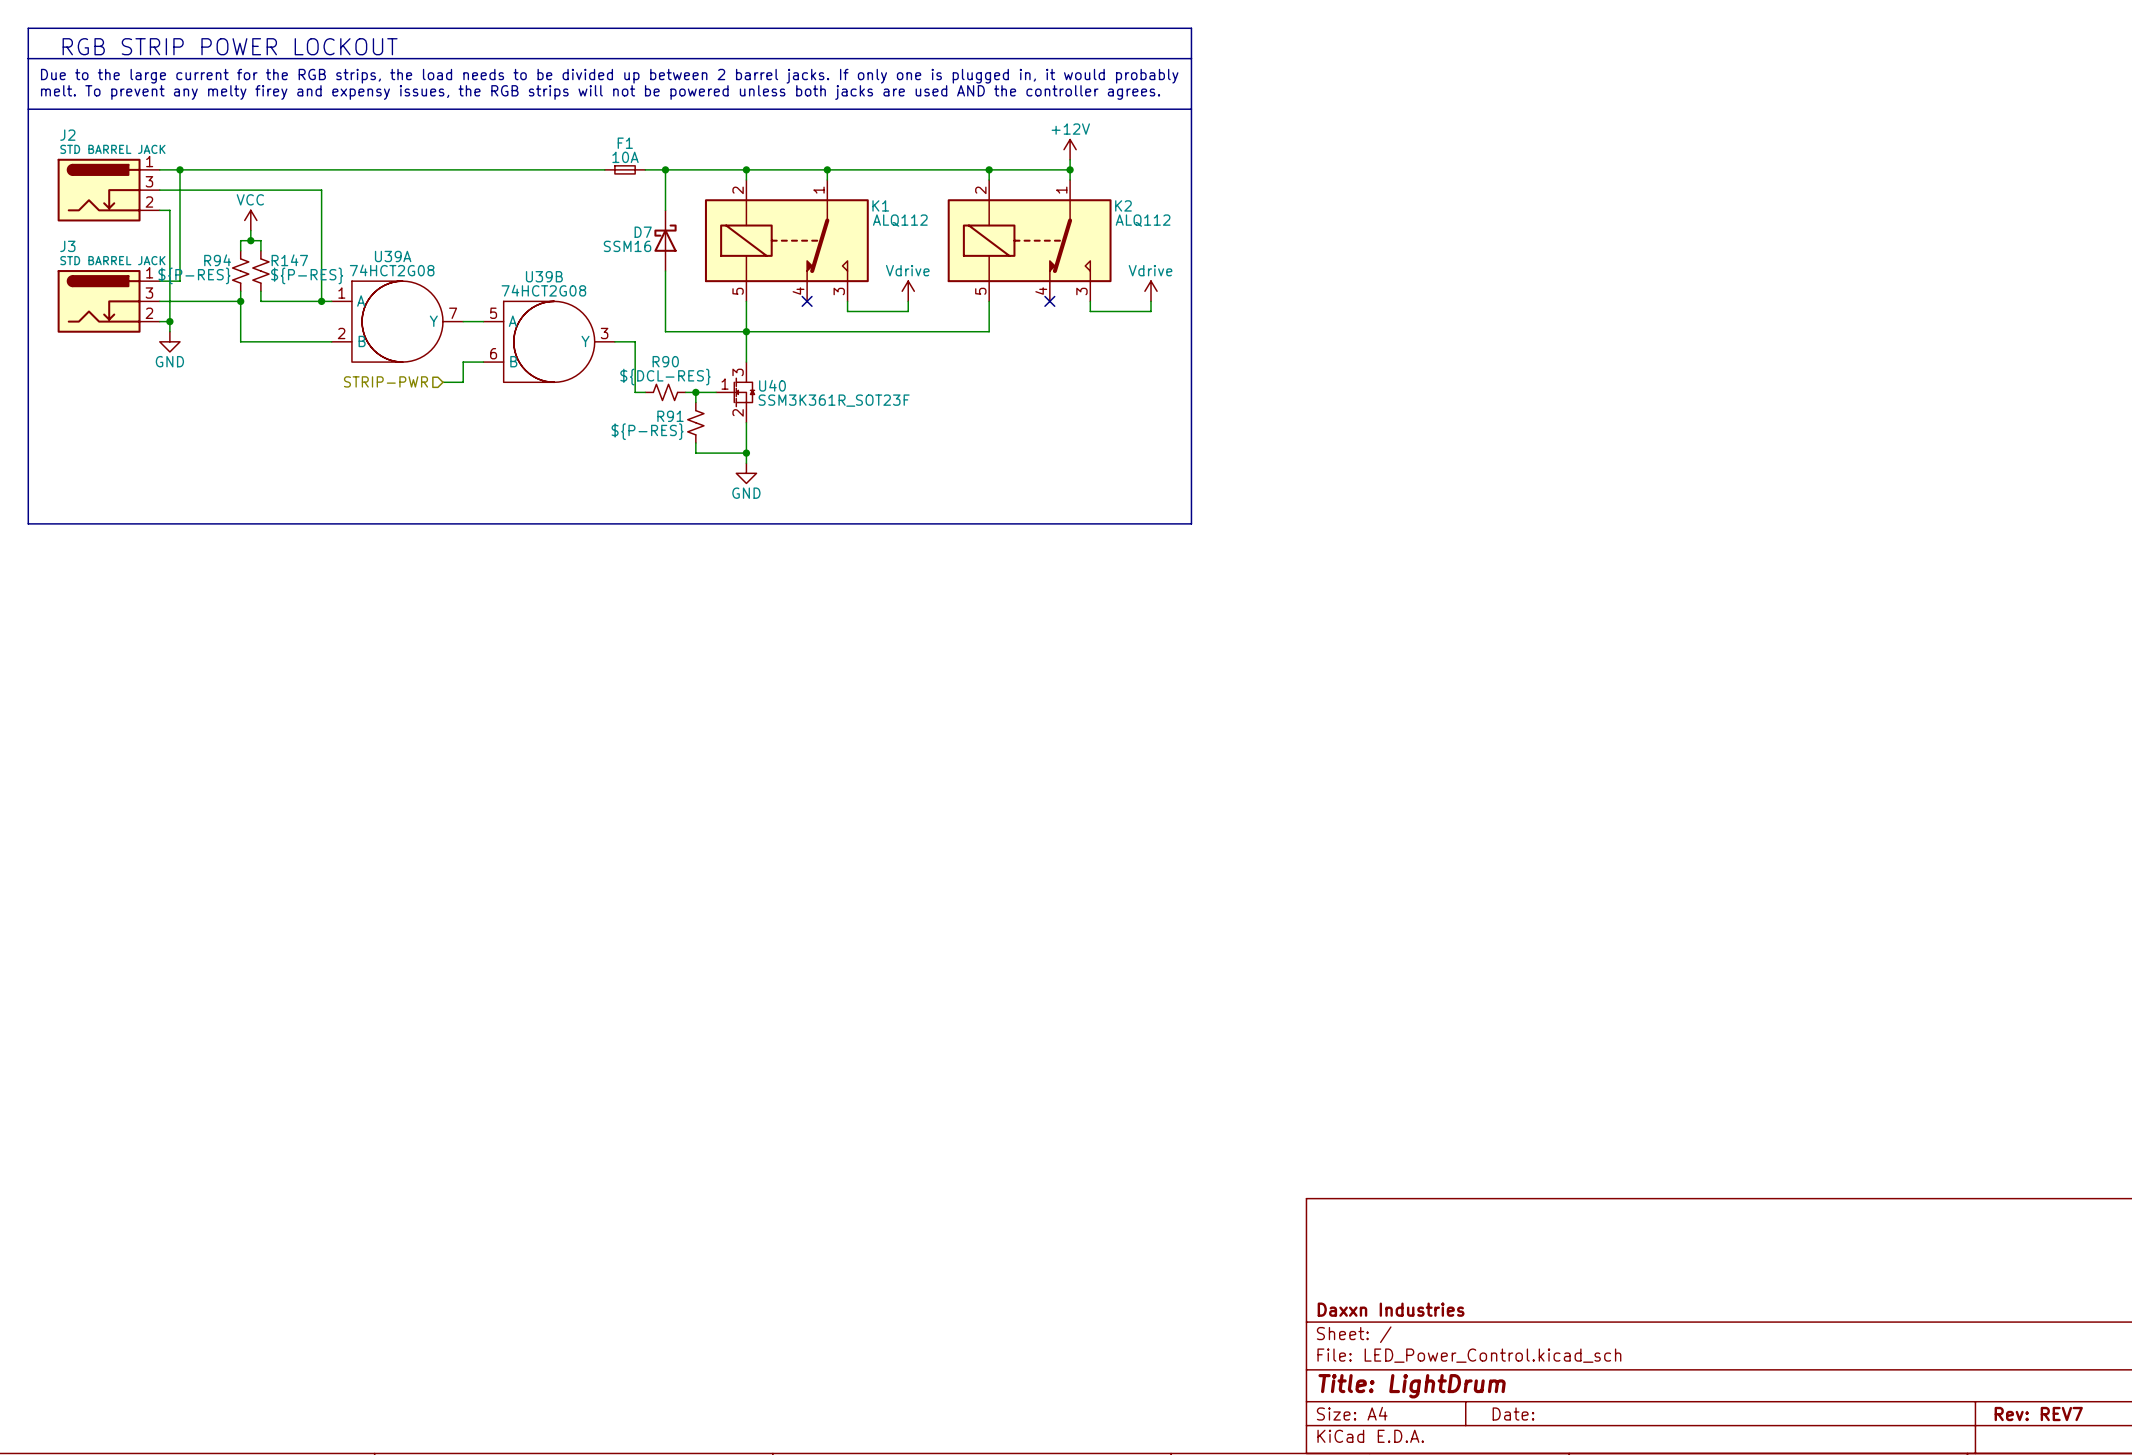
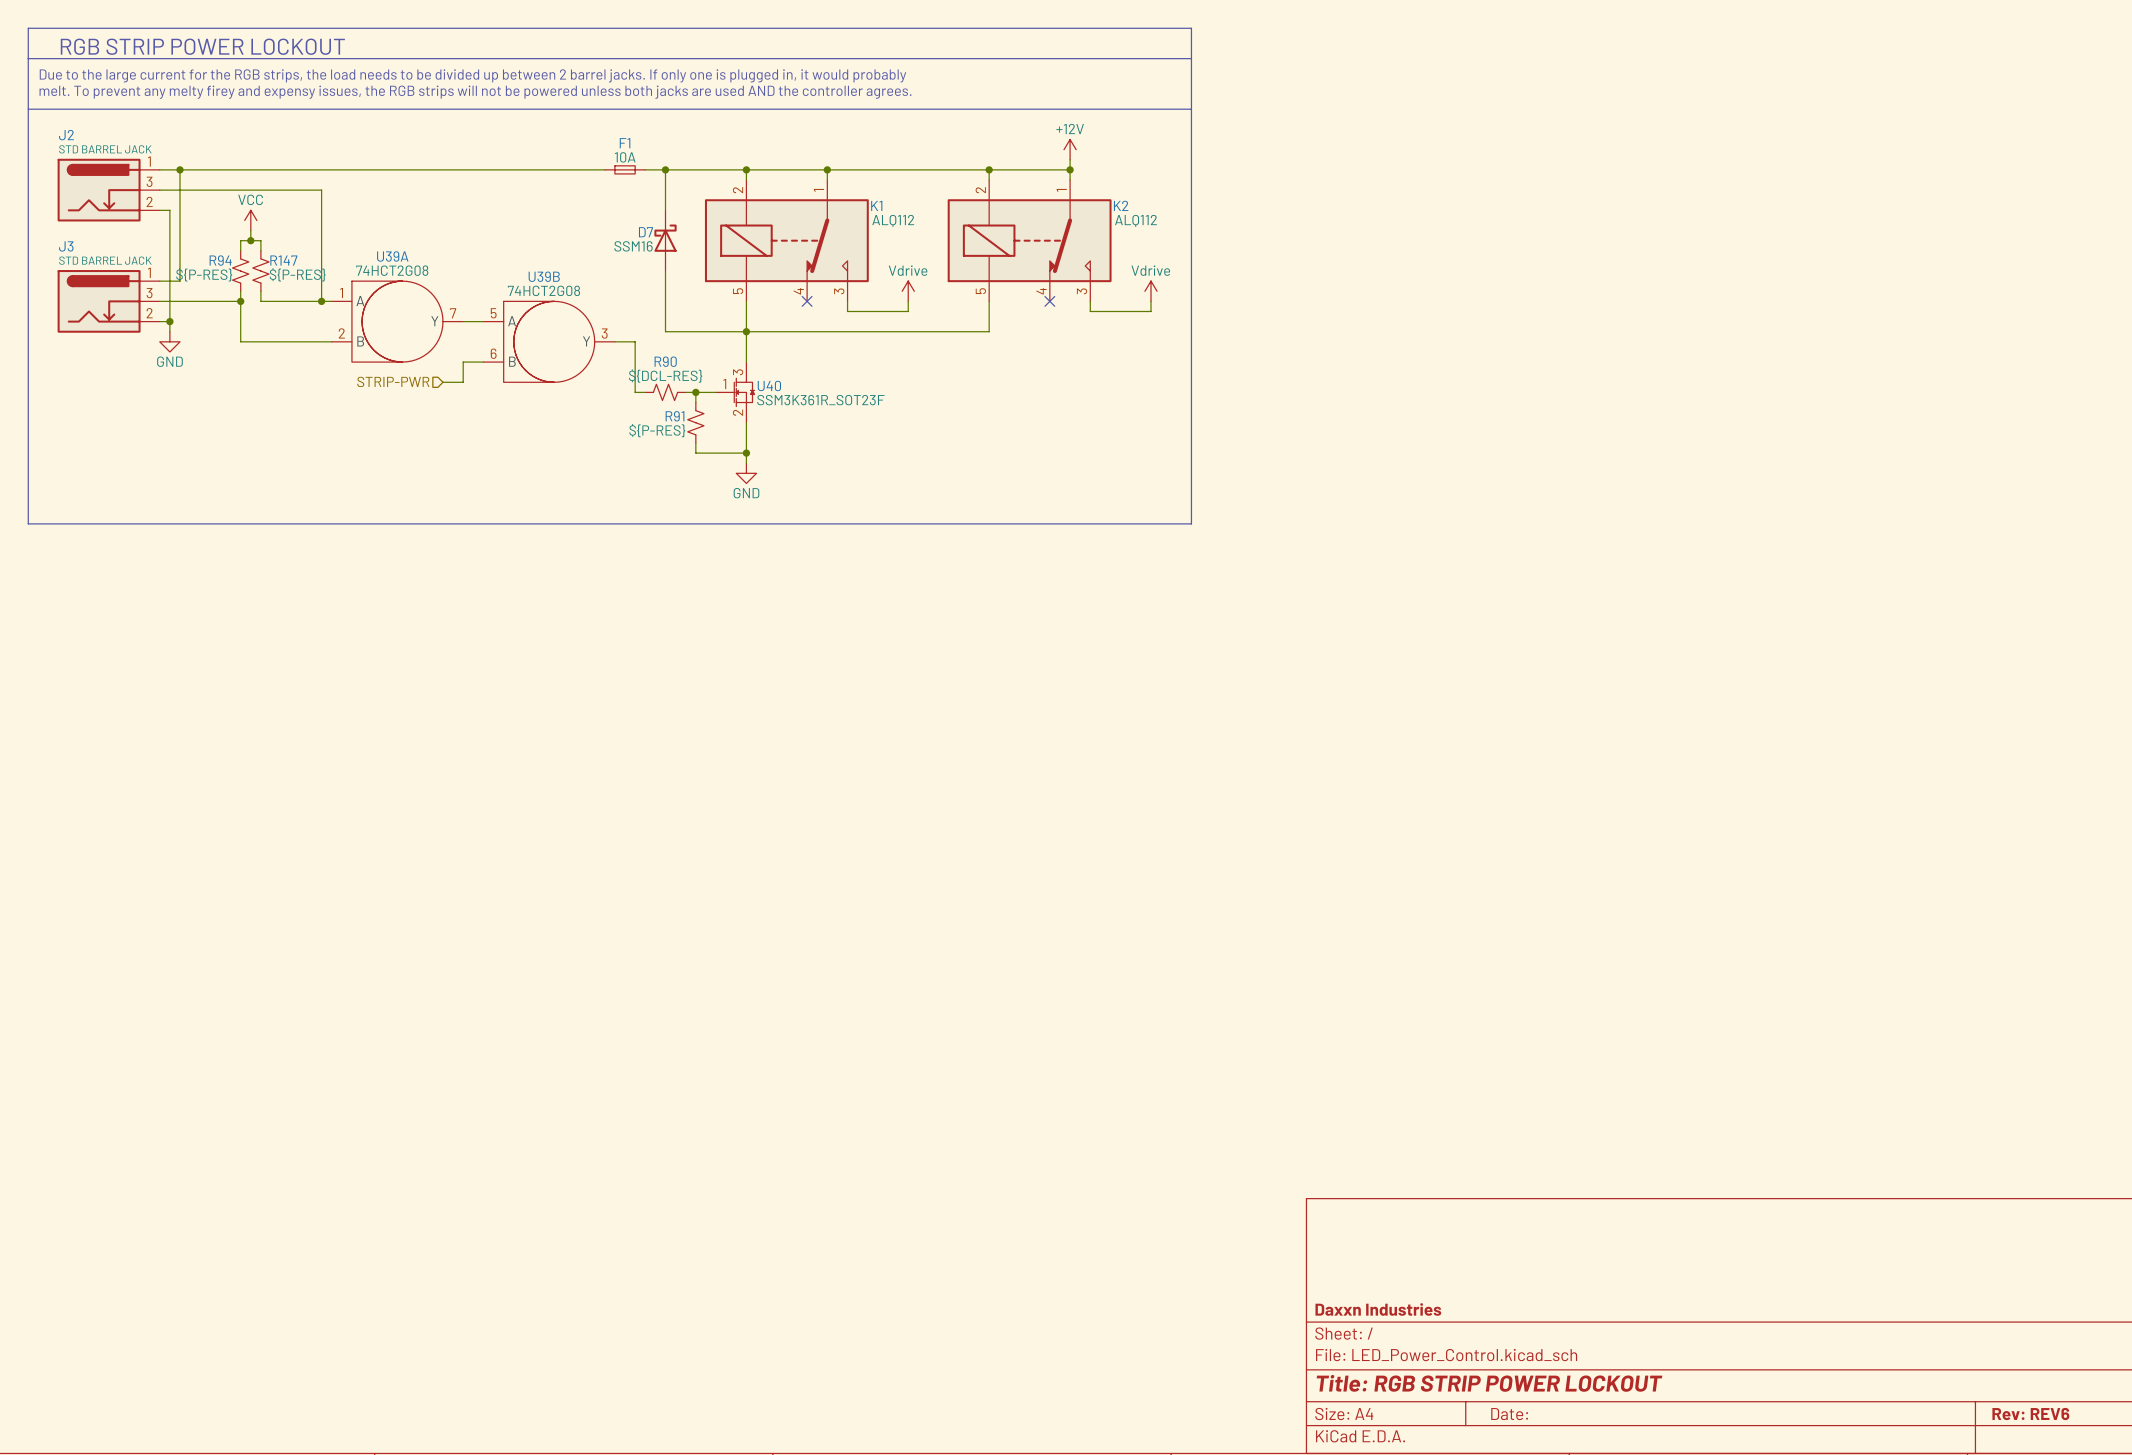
title block: Title: LightDrum (1412, 1386) -> Title: RGB STRIP POWER LOCKOUT (1489, 1383)
title block: Rev: REV7 (2038, 1414) -> Rev: REV6 (2030, 1414)

